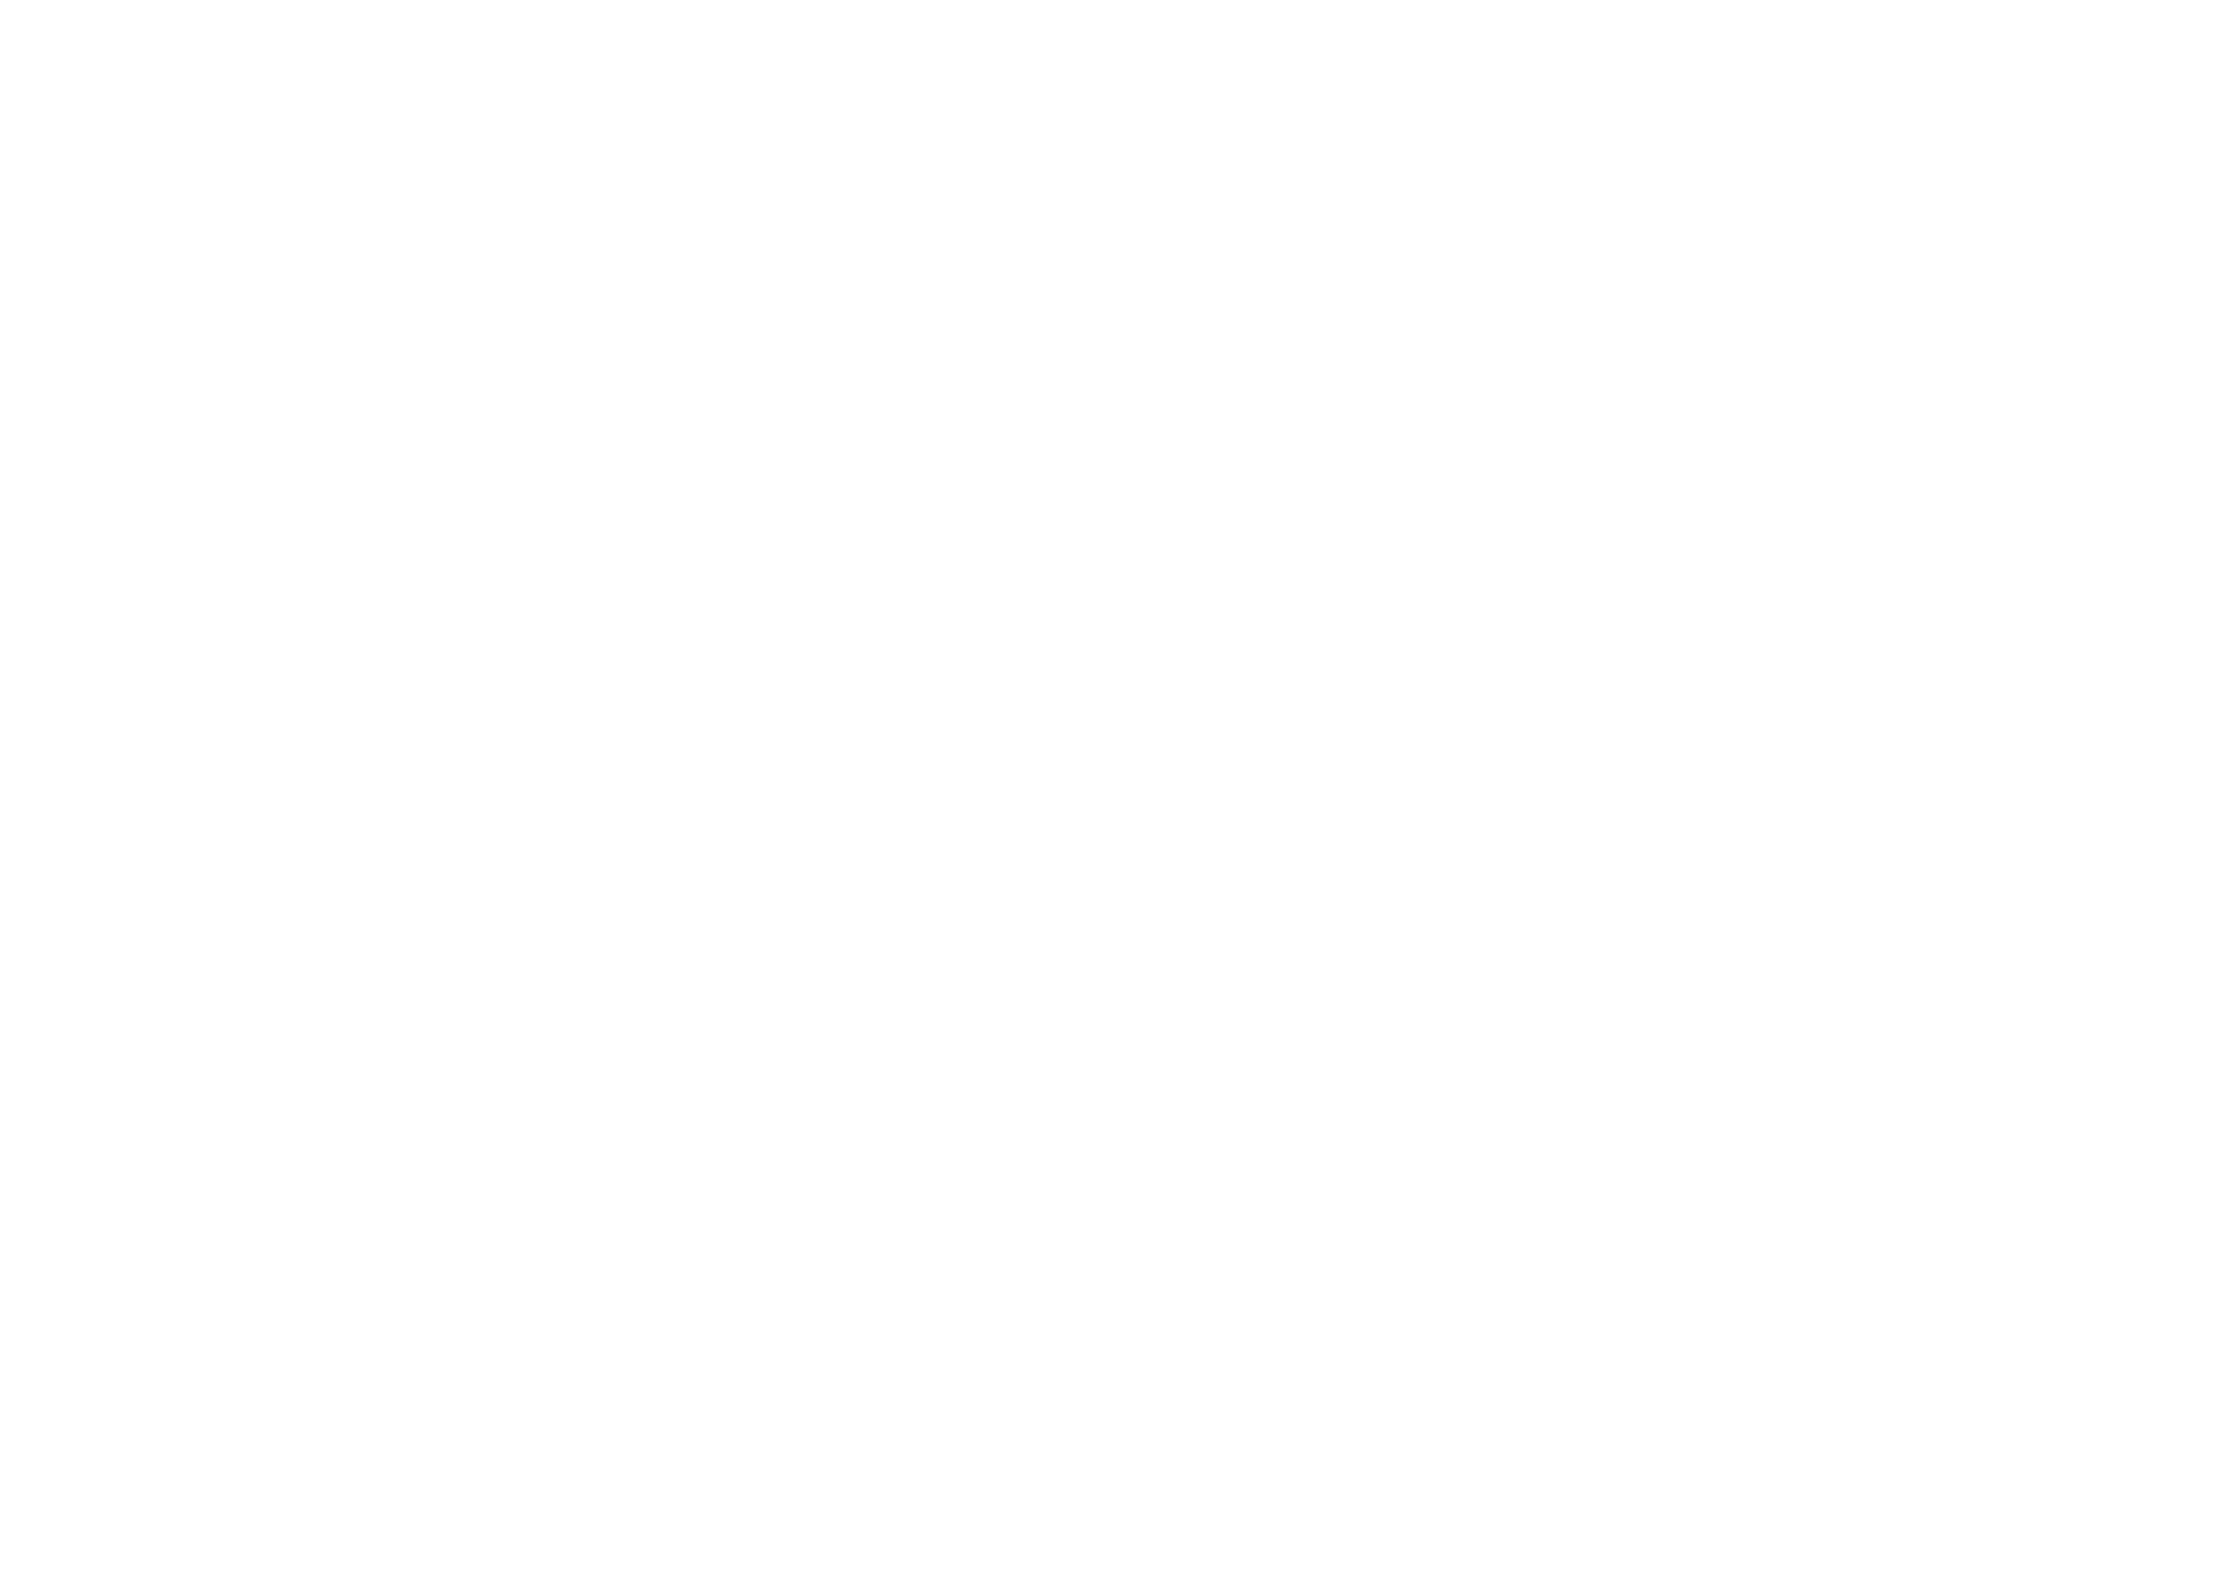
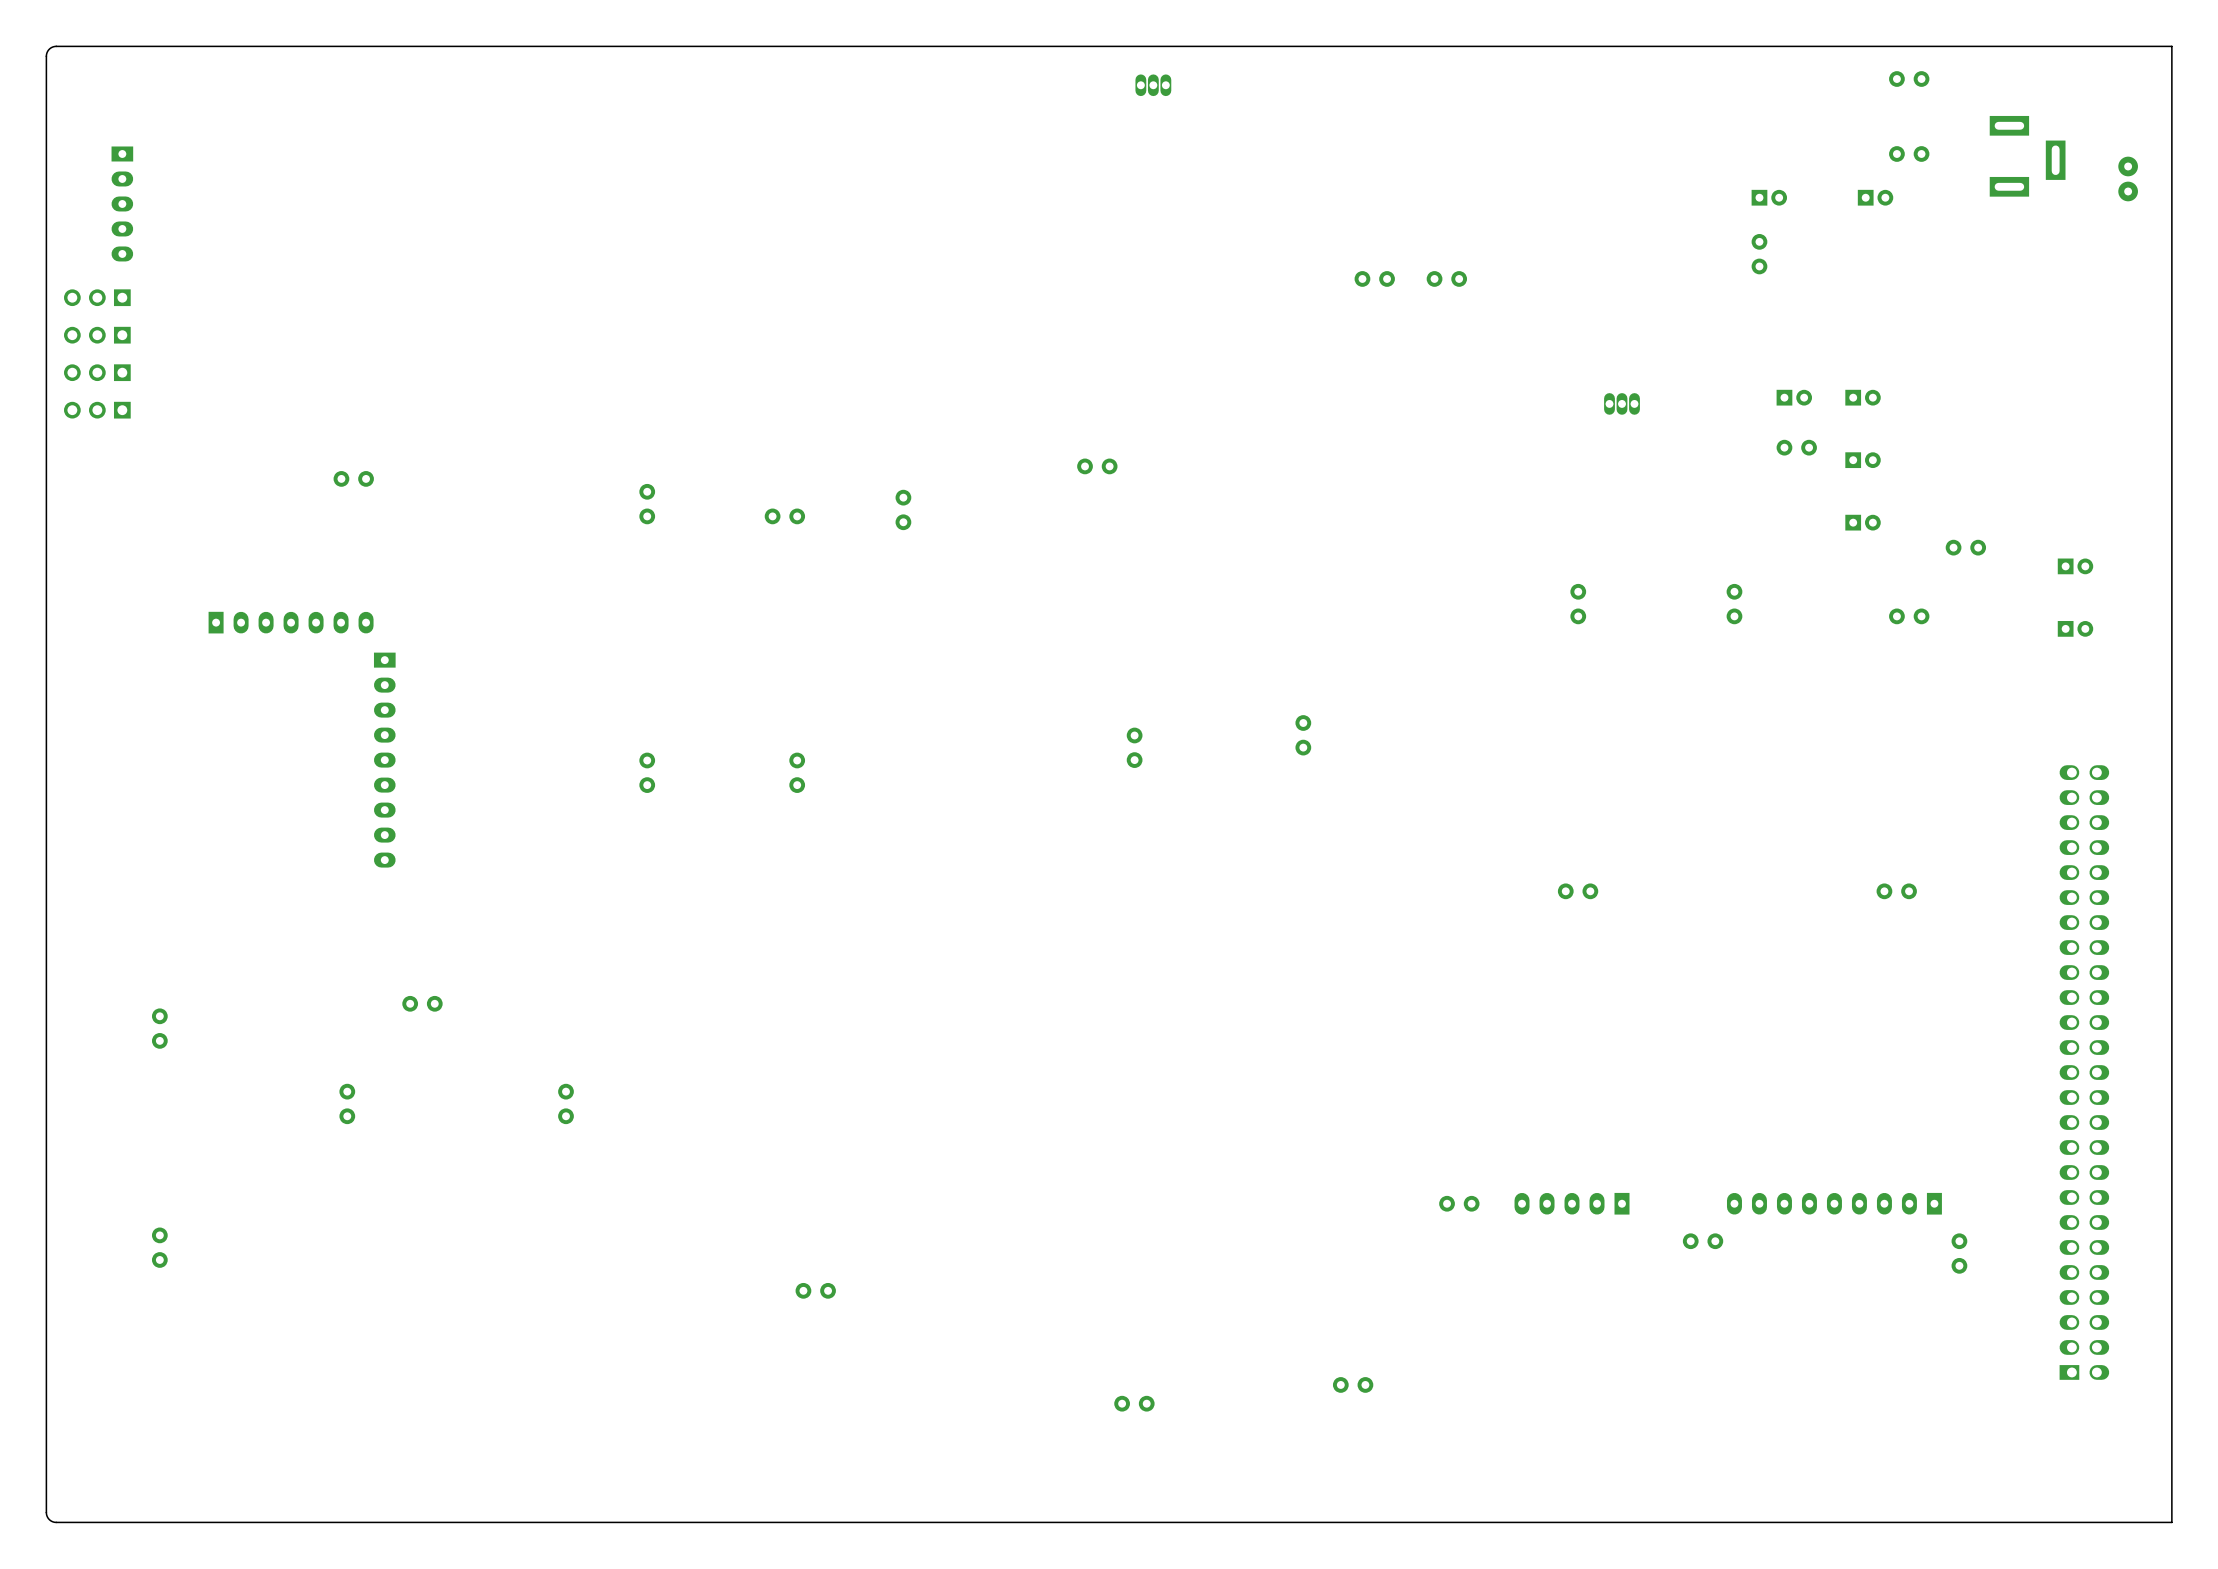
board edge: none -> (2171, 46) (2171, 1522) (56, 1522) (47, 1517) (46, 1512) (46, 56) (50, 47) (56, 46) (2171, 46)
part: none -> (1909, 79)
part: none -> (1153, 85)
part: none -> (1909, 153)
part: none -> (2027, 156)
part: none -> (2128, 178)
part: none -> (1769, 197)
part: none -> (1875, 197)
part: none -> (122, 203)
part: none -> (1759, 254)
part: none -> (1374, 278)
part: none -> (1446, 278)
part: none -> (97, 297)
part: none -> (97, 335)
part: none -> (97, 372)
part: none -> (1794, 397)
part: none -> (1863, 397)
part: none -> (1622, 403)
part: none -> (97, 410)
part: none -> (1796, 447)
part: none -> (1863, 460)
part: none -> (1097, 466)
part: none -> (353, 478)
part: none -> (647, 504)
part: none -> (903, 509)
part: none -> (784, 516)
part: none -> (1863, 522)
part: none -> (1965, 547)
part: none -> (2075, 566)
part: none -> (1578, 604)
part: none -> (1734, 604)
part: none -> (1909, 616)
part: none -> (291, 622)
part: none -> (2075, 628)
part: none -> (1303, 735)
part: none -> (1134, 747)
part: none -> (384, 760)
part: none -> (647, 772)
part: none -> (797, 772)
part: none -> (1578, 891)
part: none -> (1896, 891)
part: none -> (422, 1003)
part: none -> (159, 1028)
part: none -> (2084, 1072)
part: none -> (347, 1103)
part: none -> (566, 1103)
part: none -> (1459, 1203)
part: none -> (1572, 1203)
part: none -> (1834, 1203)
part: none -> (1703, 1241)
part: none -> (159, 1247)
part: none -> (1959, 1253)
part: none -> (815, 1290)
part: none -> (1353, 1384)
part: none -> (1134, 1403)

